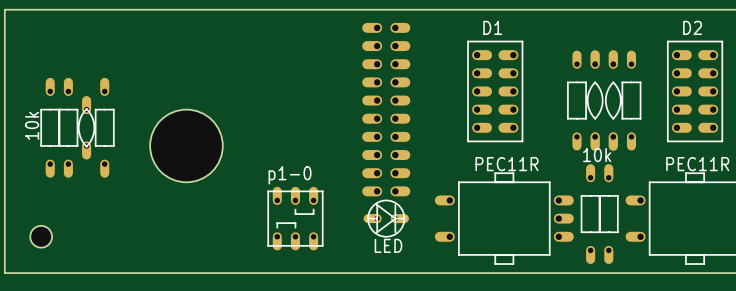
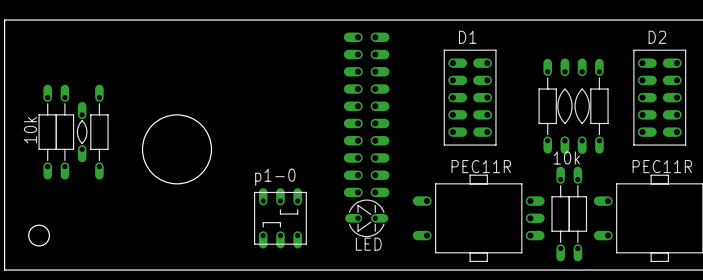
part footprint: [567, 50, 587, 151] -> [538, 58, 557, 154]
part footprint: [621, 50, 642, 151] -> [590, 58, 609, 154]
part footprint: [40, 77, 60, 178] -> [38, 84, 57, 180]
part footprint: [58, 77, 78, 178] -> [55, 84, 74, 180]
part footprint: [95, 77, 115, 178] -> [90, 84, 109, 180]
part footprint: [78, 96, 95, 160] -> [77, 101, 88, 163]
part footprint: [581, 164, 601, 265] -> [551, 166, 570, 262]
part footprint: [599, 164, 619, 265] -> [568, 166, 587, 262]
part footprint: [363, 199, 409, 238] -> [345, 199, 389, 237]

